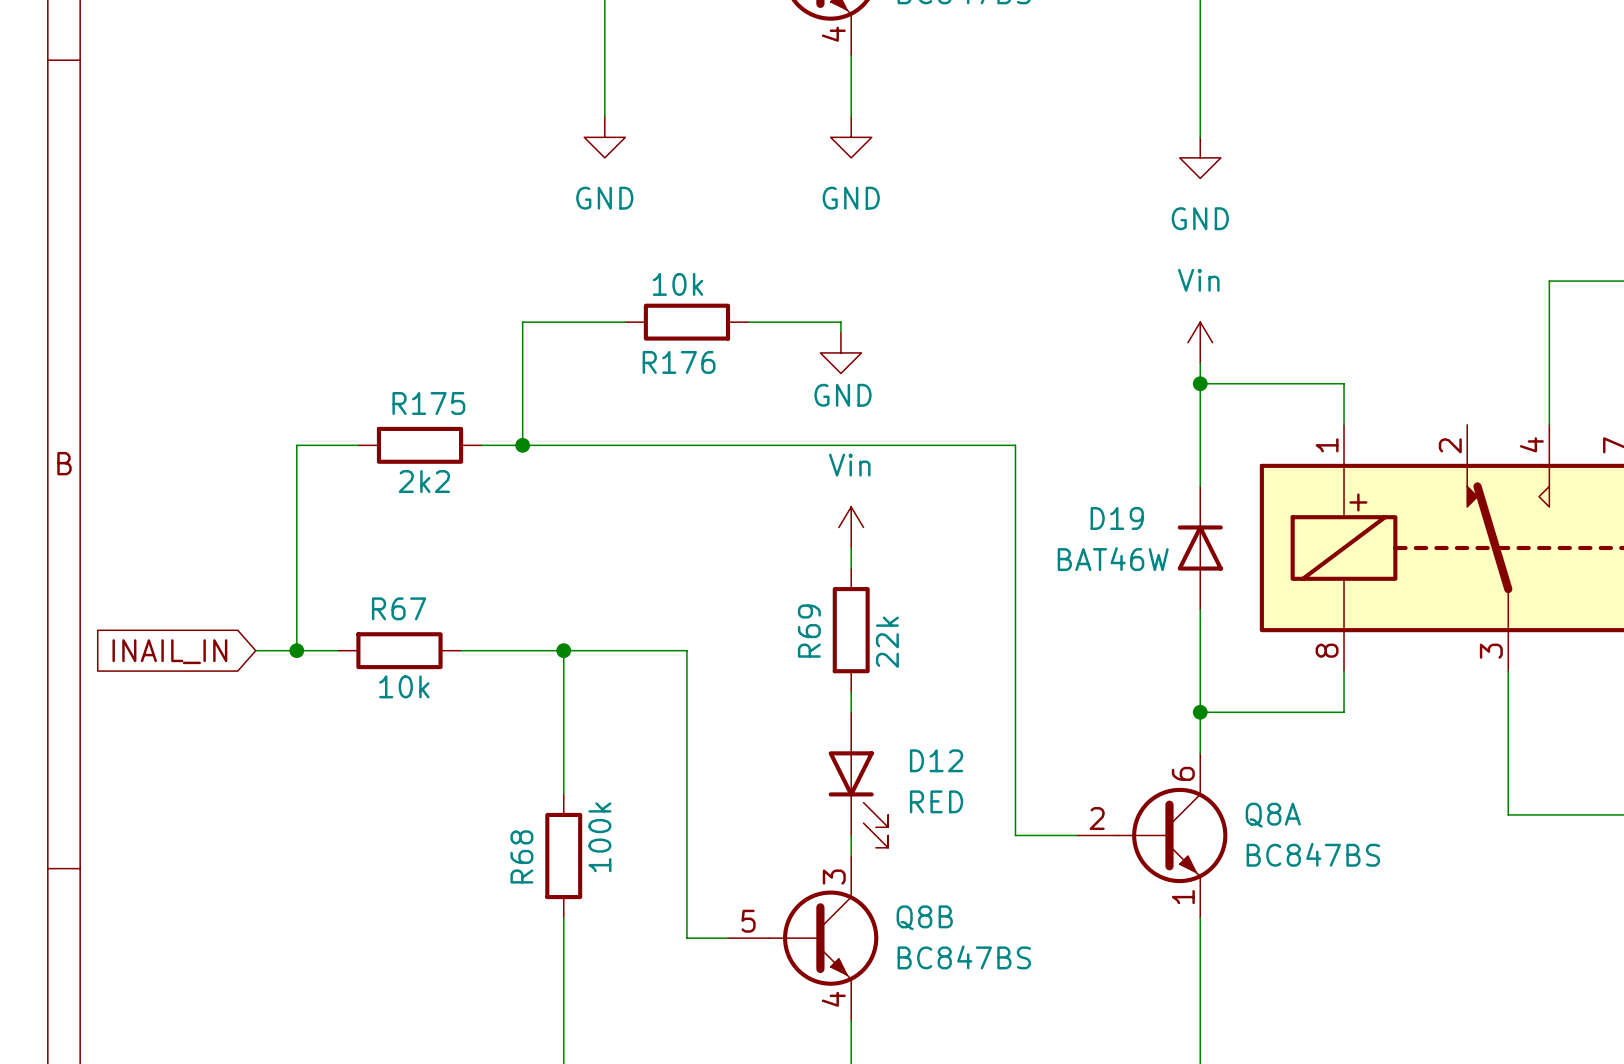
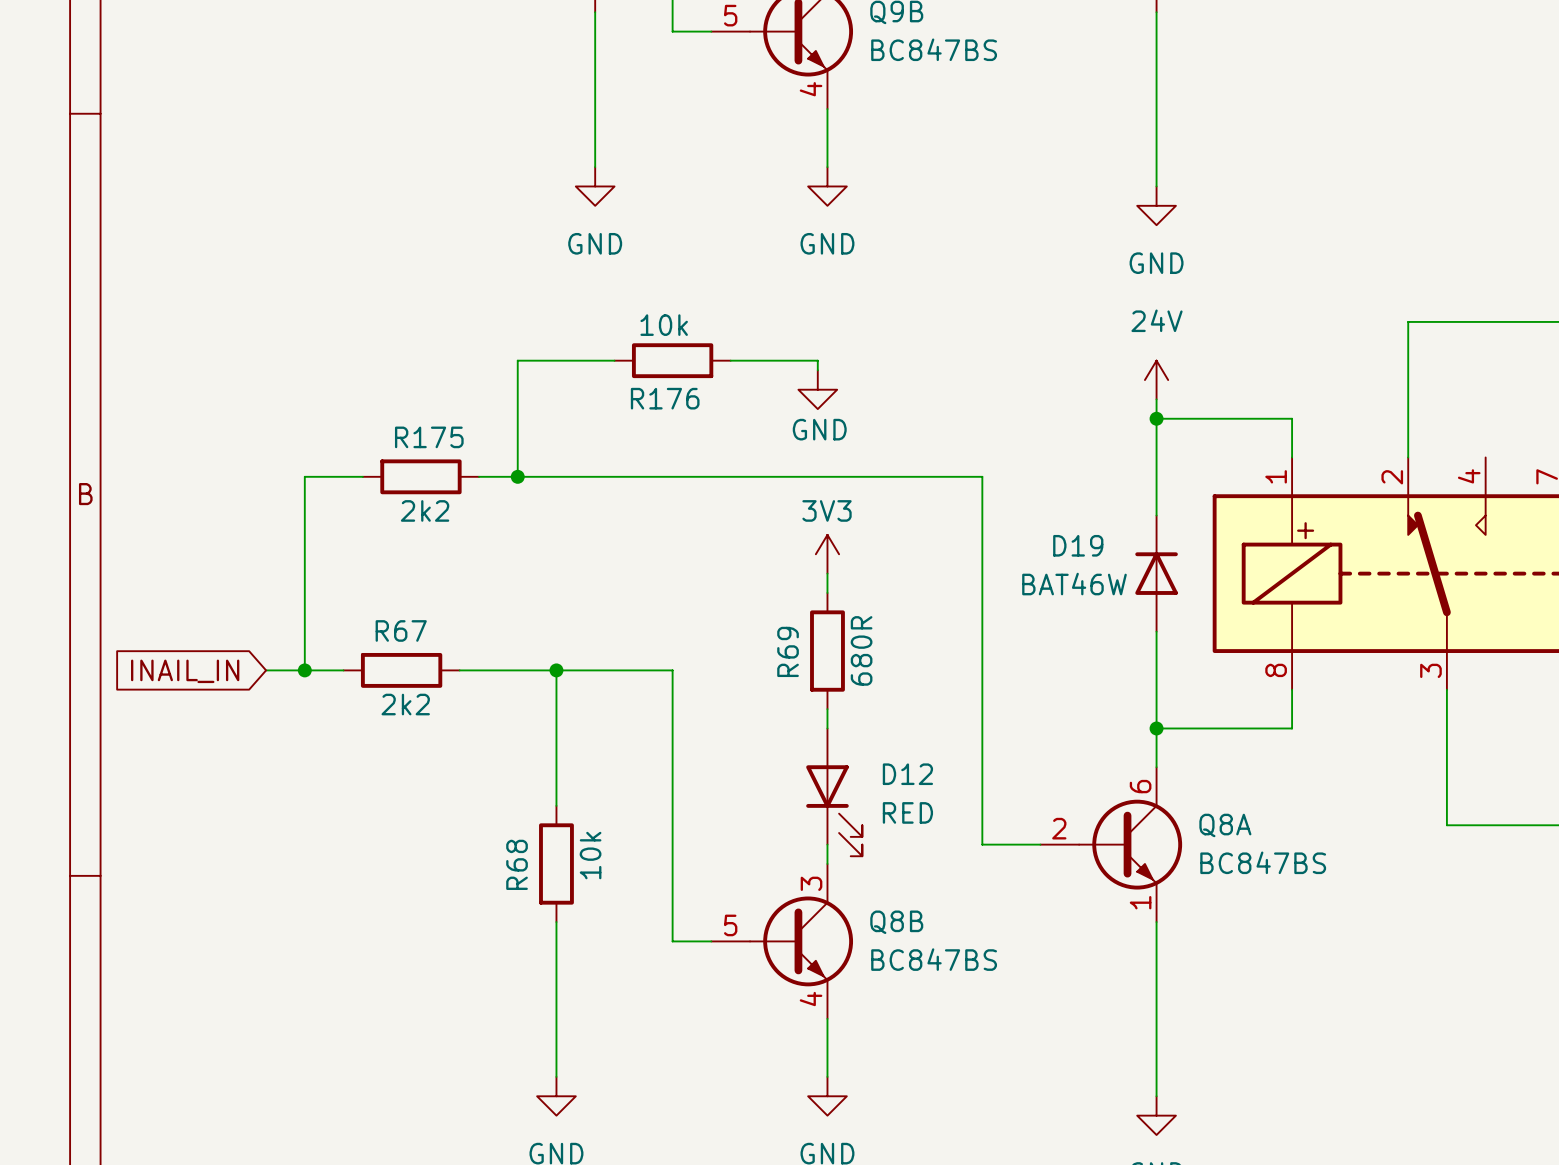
wire: (1549, 281) (1549, 424) -> (1485, 321) (1408, 321) (1408, 457)
power symbol: Vin (1200, 342) -> 24V (1156, 380)
power symbol: Vin (851, 527) -> 3V3 (827, 554)
R69 value: 22k (887, 642) -> 680R (861, 650)
R67 value: 10k (404, 686) -> 2k2 (405, 704)
R68 value: 100k (599, 837) -> 10k (590, 855)

